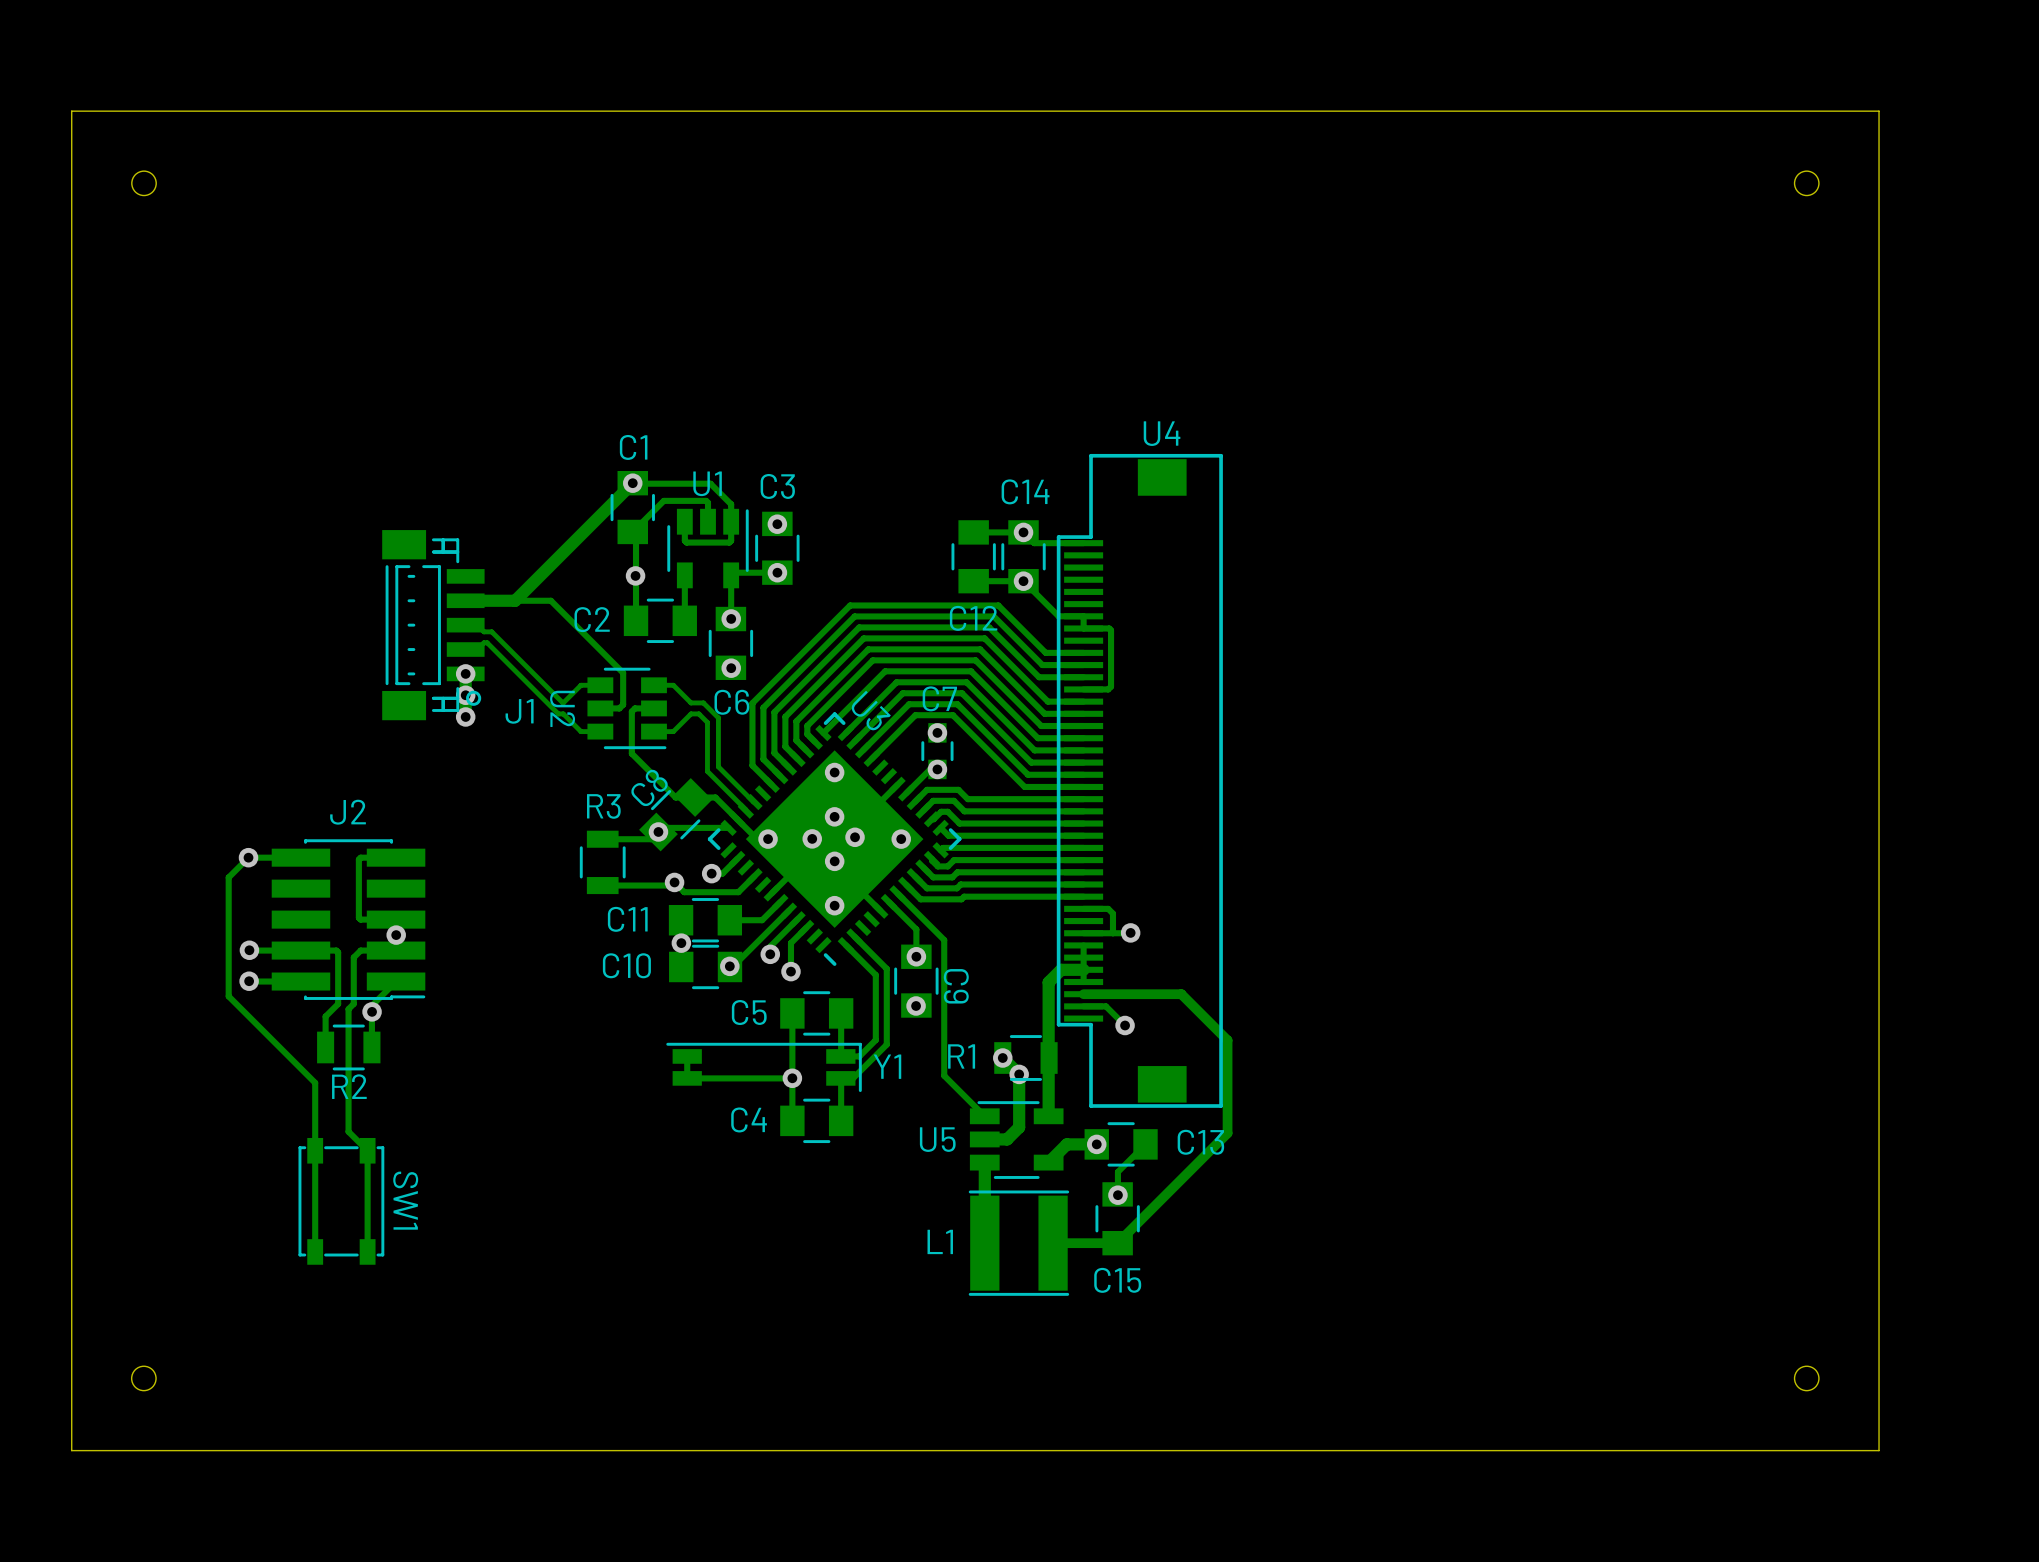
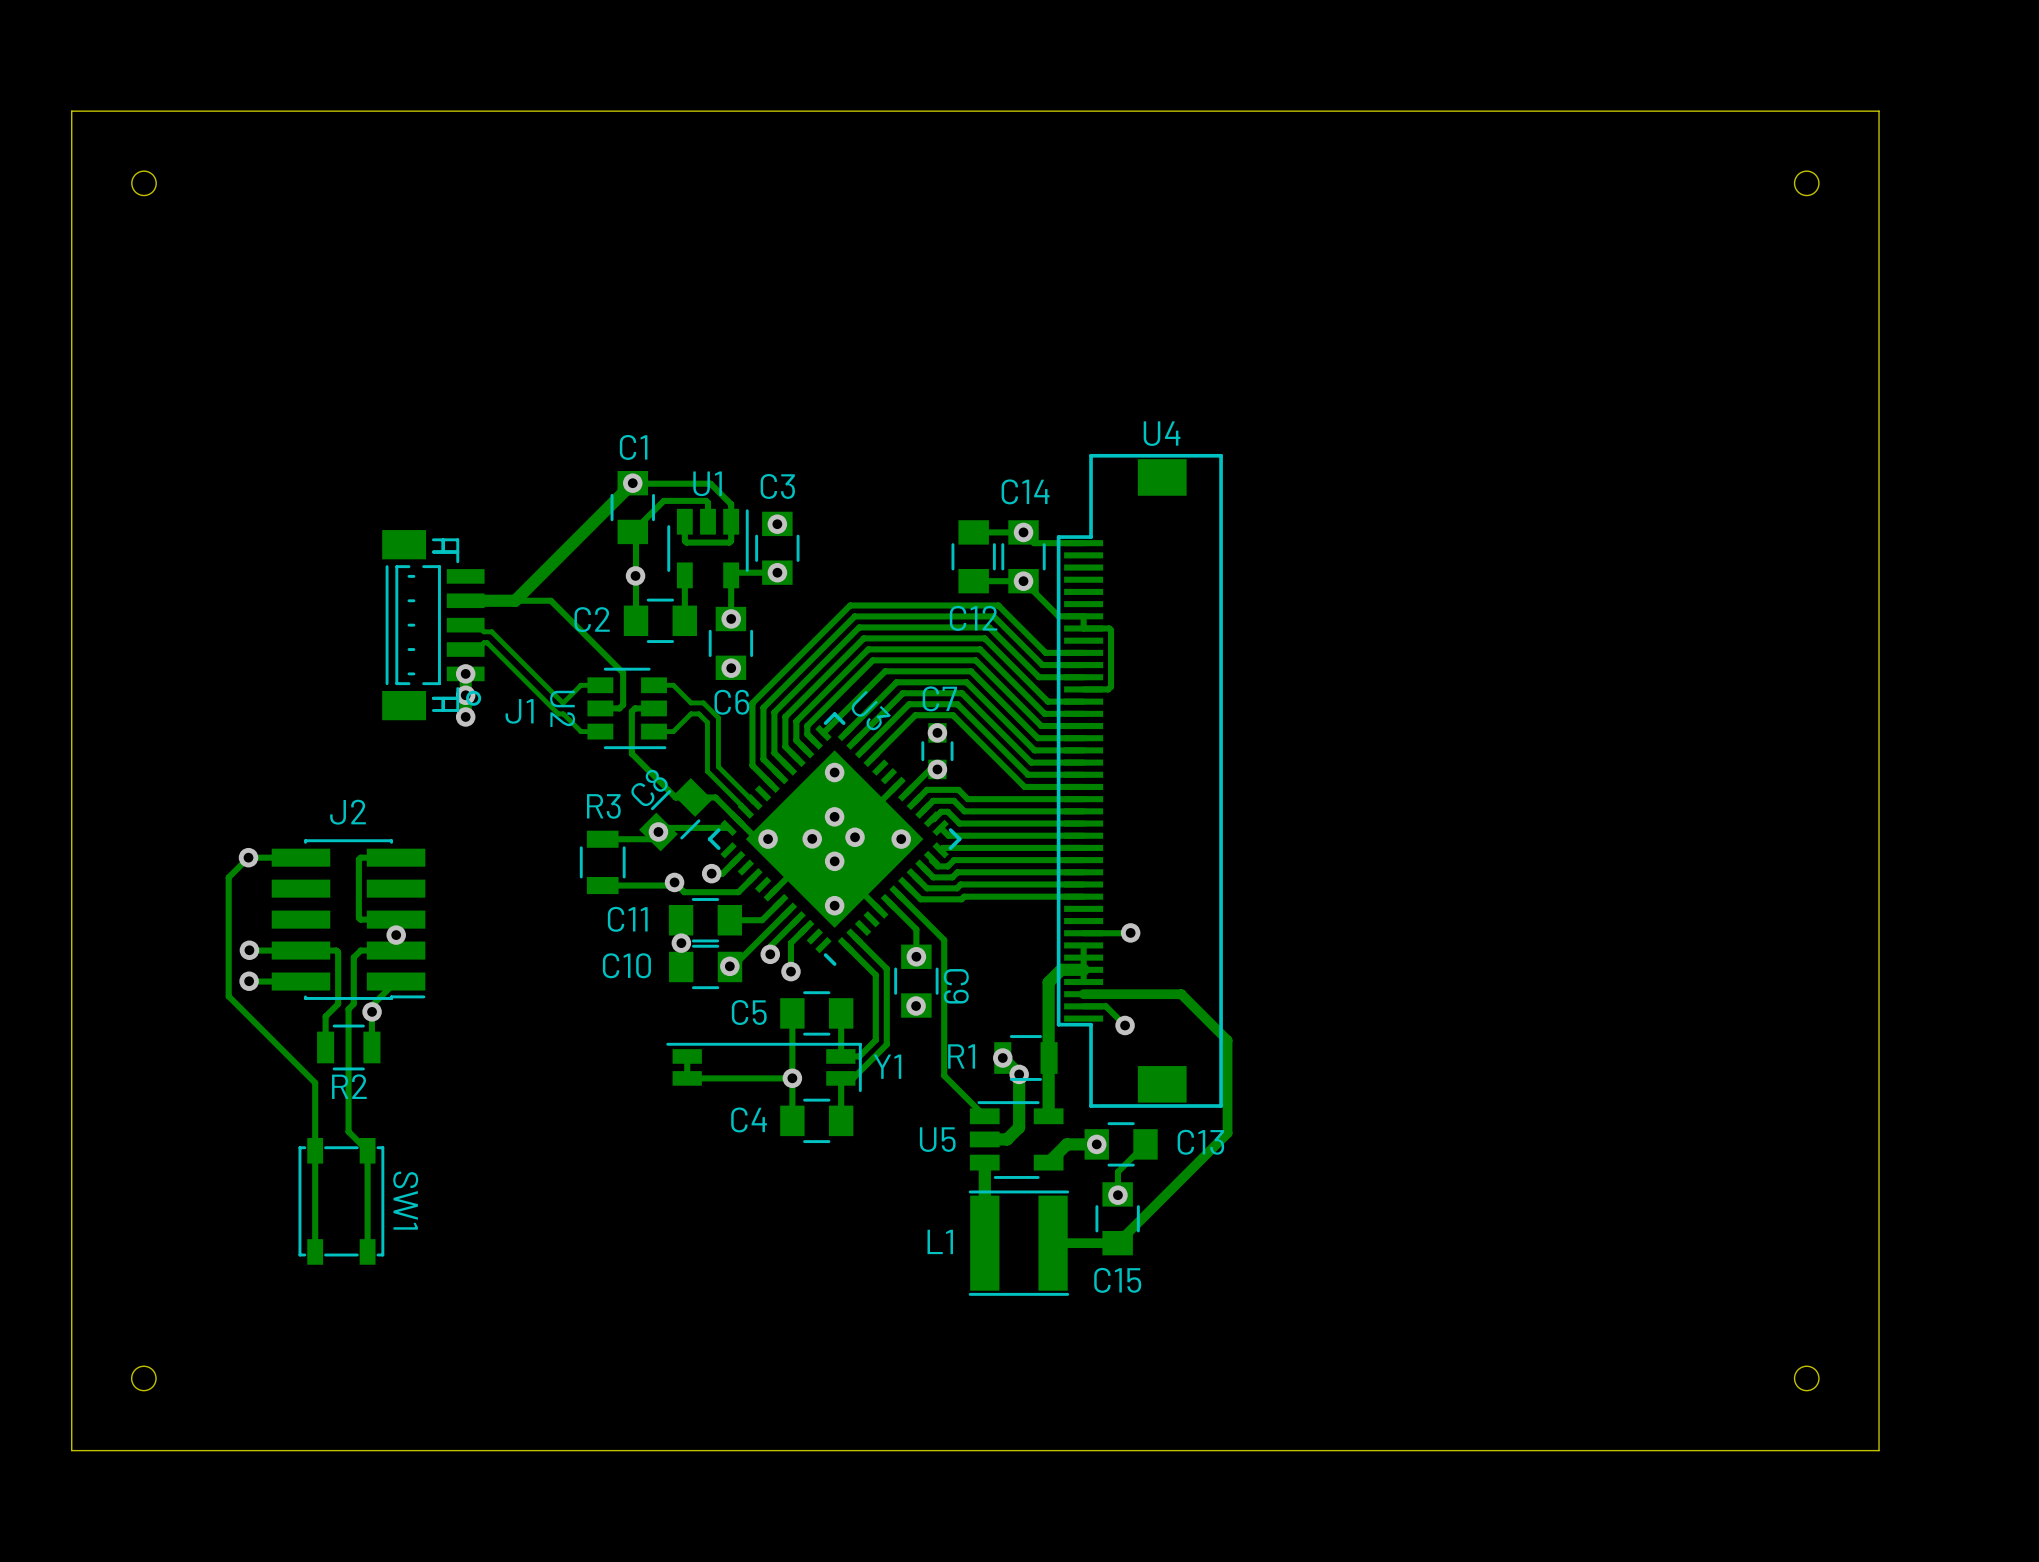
track: (1083, 908) (1108, 908) (1112, 913) (1112, 933) -> none

